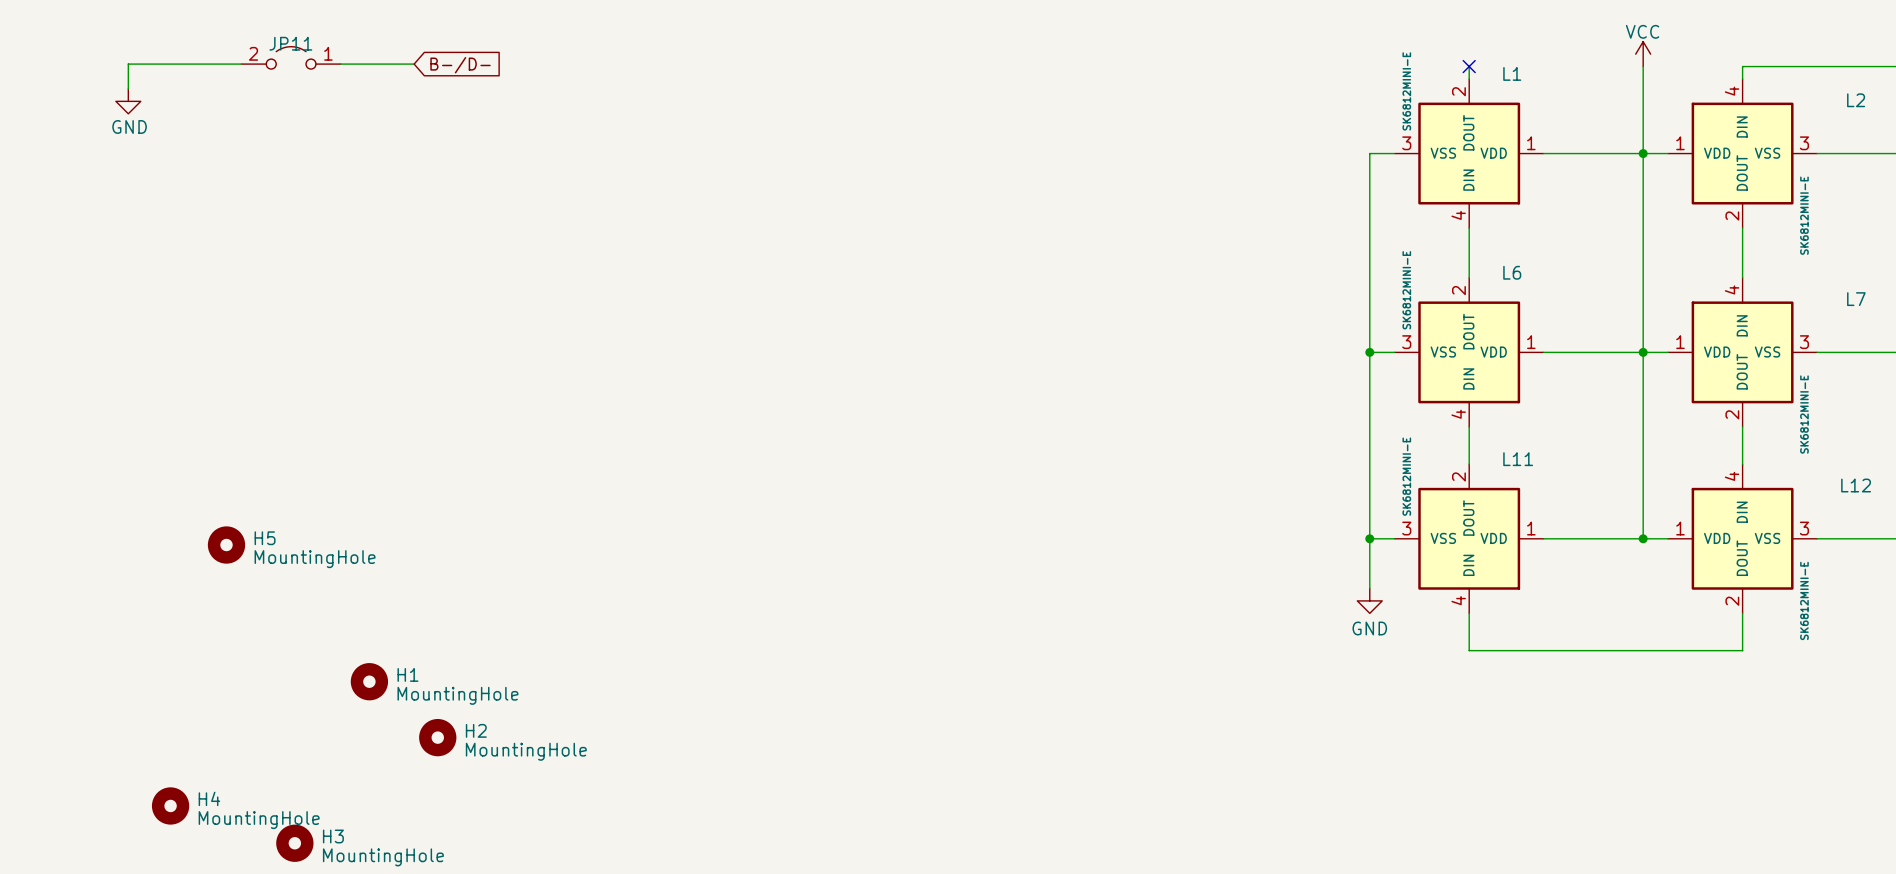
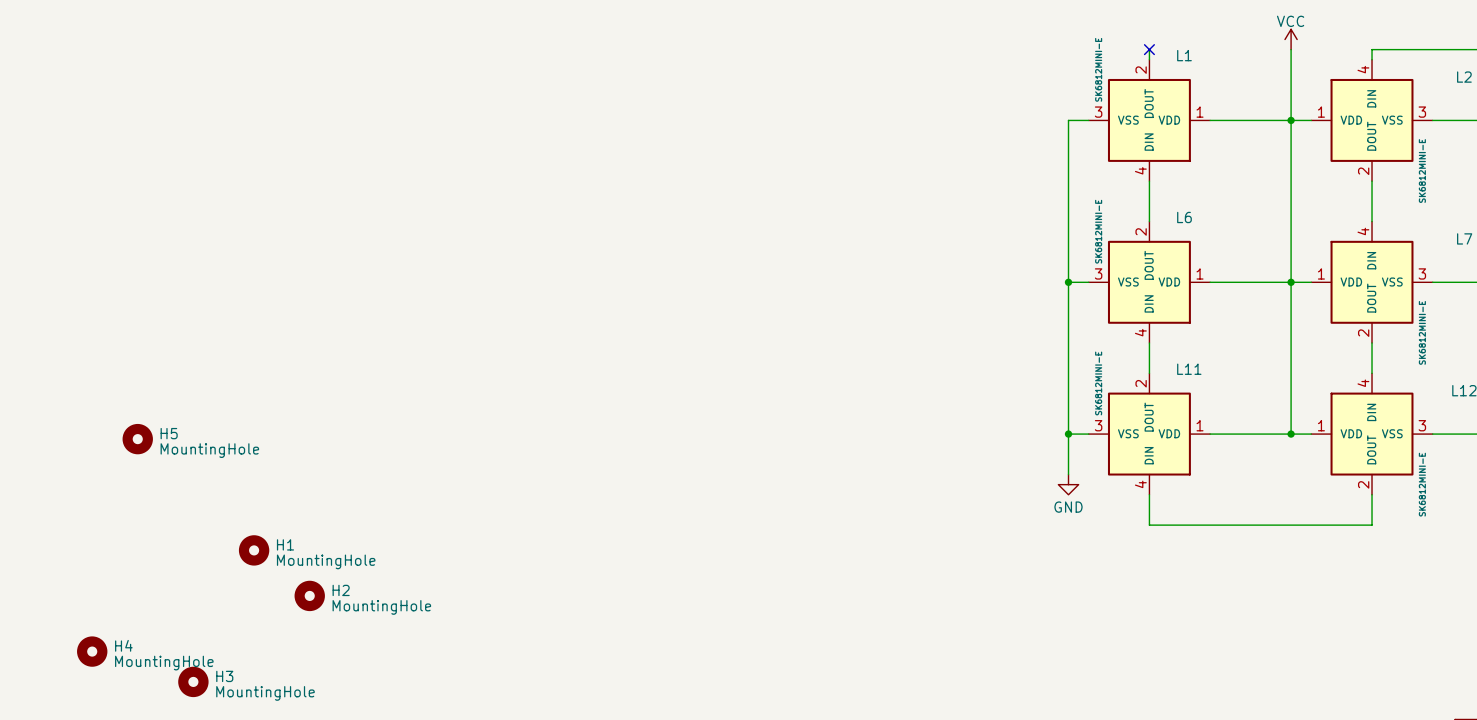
JP11: (291, 57) -> none
wire: (241, 64) (128, 64) (128, 88) -> none
wire: (340, 64) (414, 64) -> none
global label: B-/D- (460, 65) -> none
power symbol: GND (128, 101) -> none

